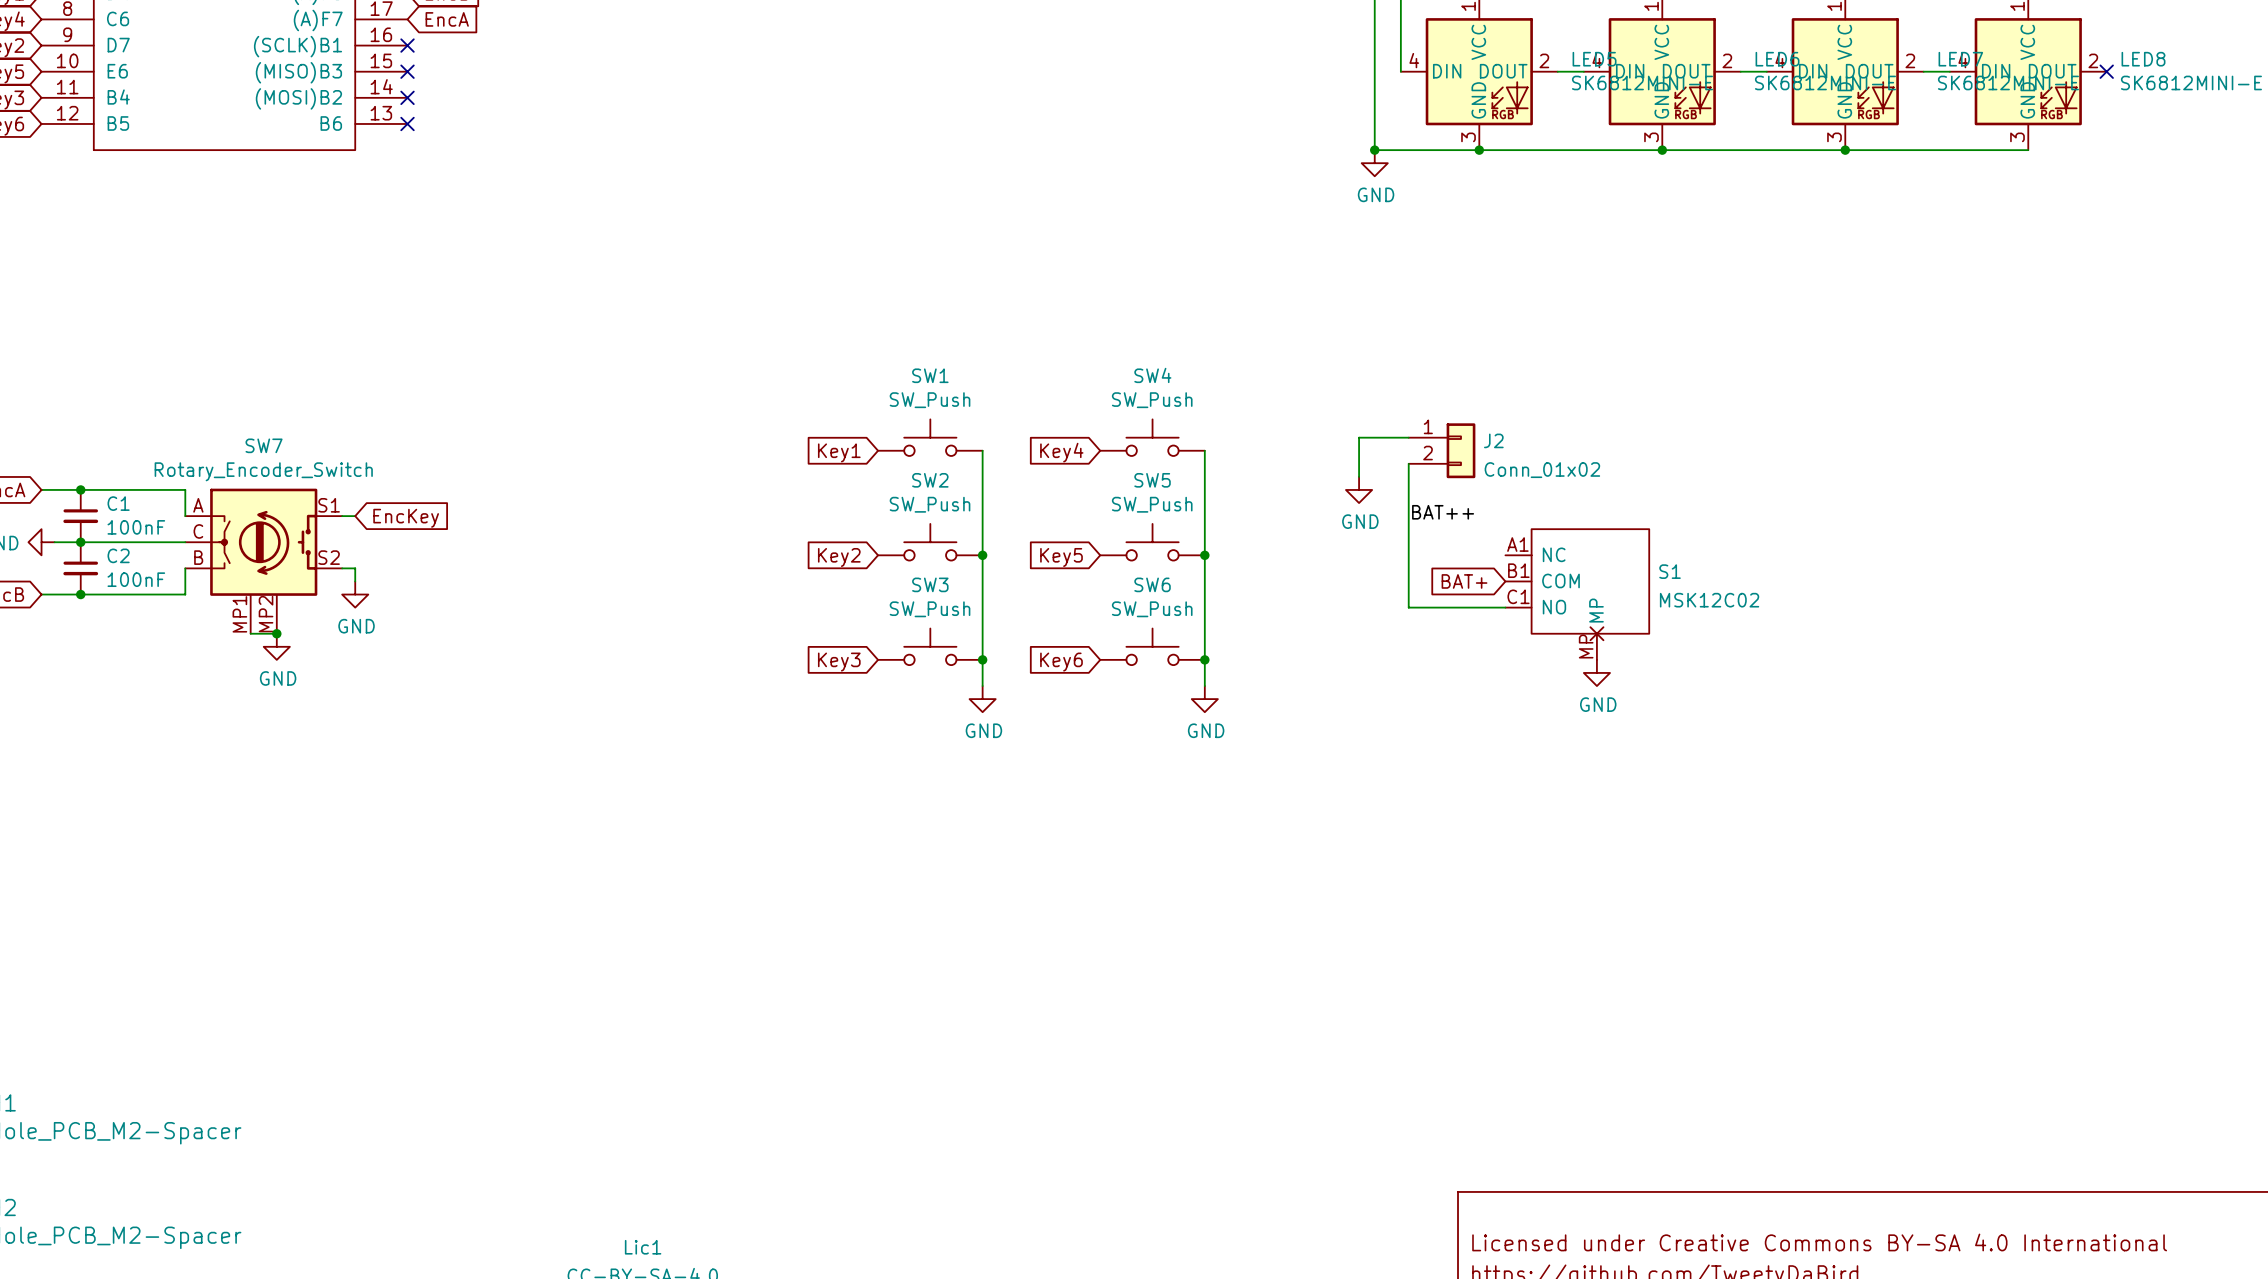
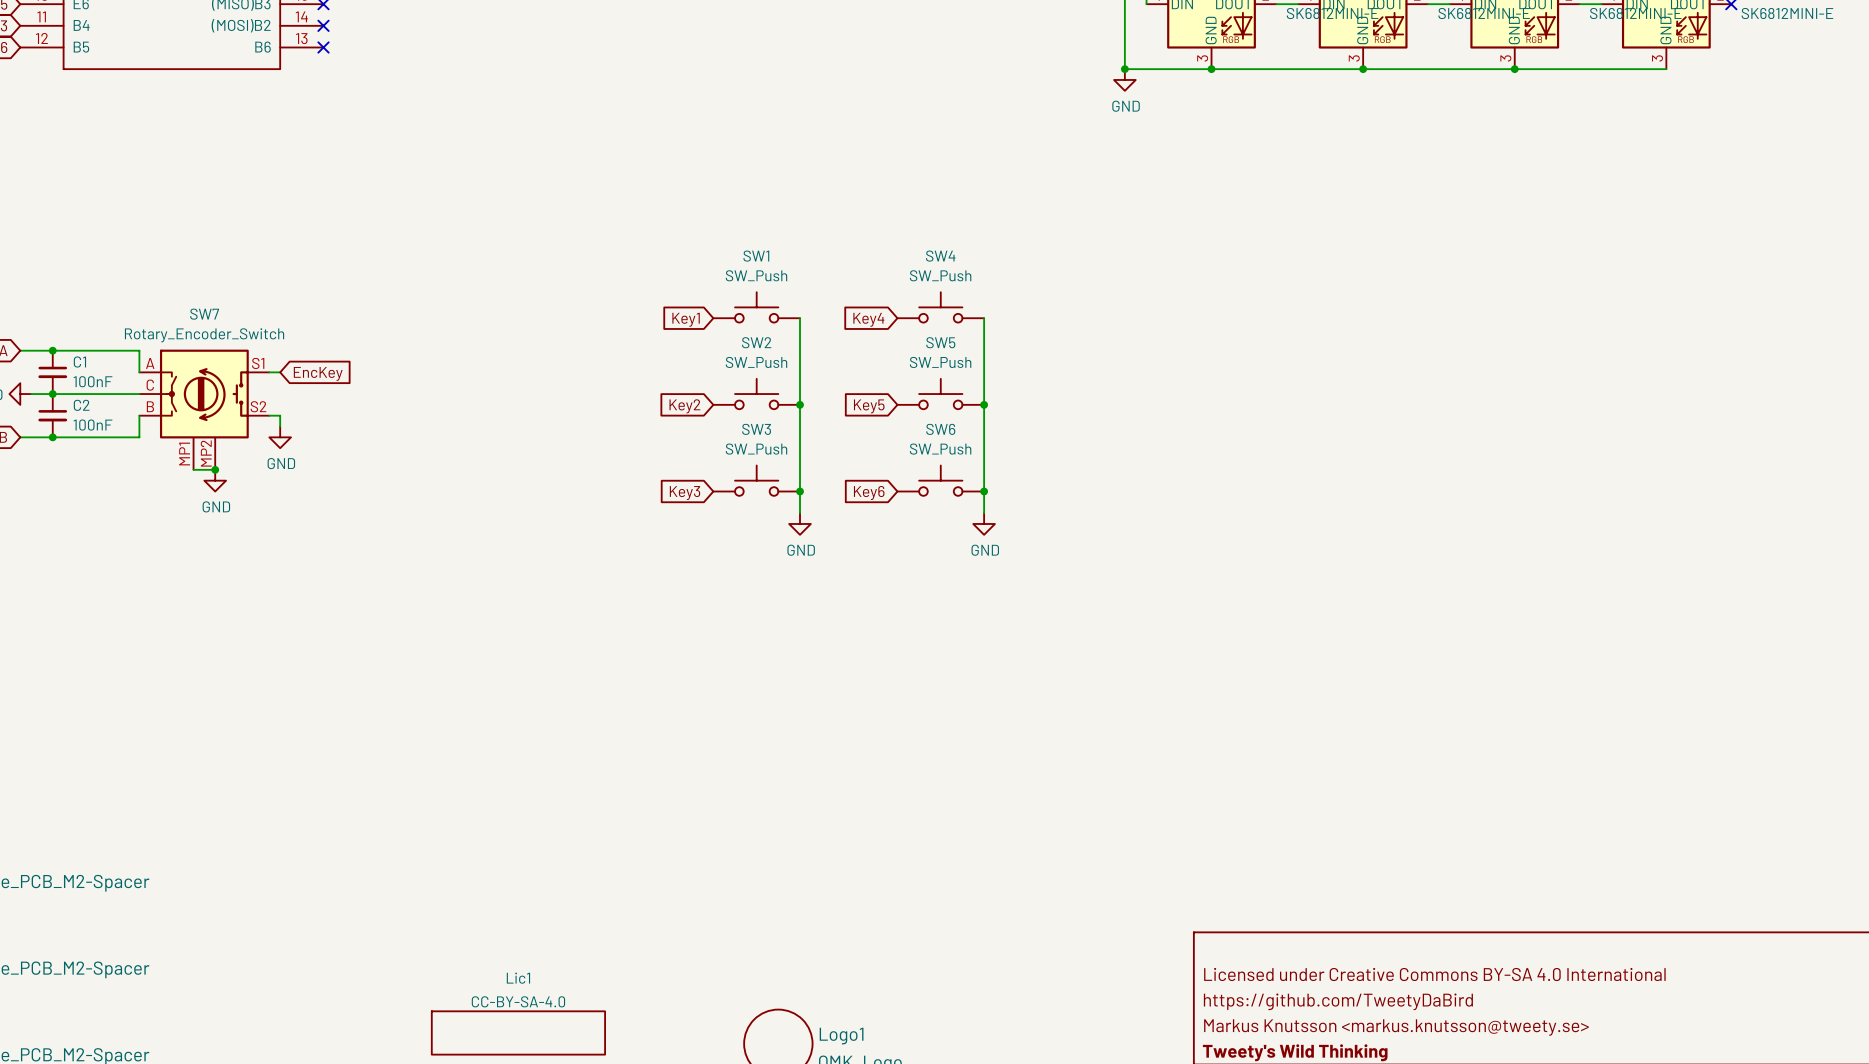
wire: (1408, 437) (1359, 437) (1359, 476) -> none
J2: Conn_01x02 (1442, 450) -> none
wire: (1408, 463) (1408, 607) (1505, 607) -> none
power symbol: GND (1359, 489) -> none
label: BAT++ (1443, 512) -> none
global label: BAT+ (1464, 581) -> none
S1: MSK12C02 (1577, 594) -> none
power symbol: GND (1596, 672) -> none

